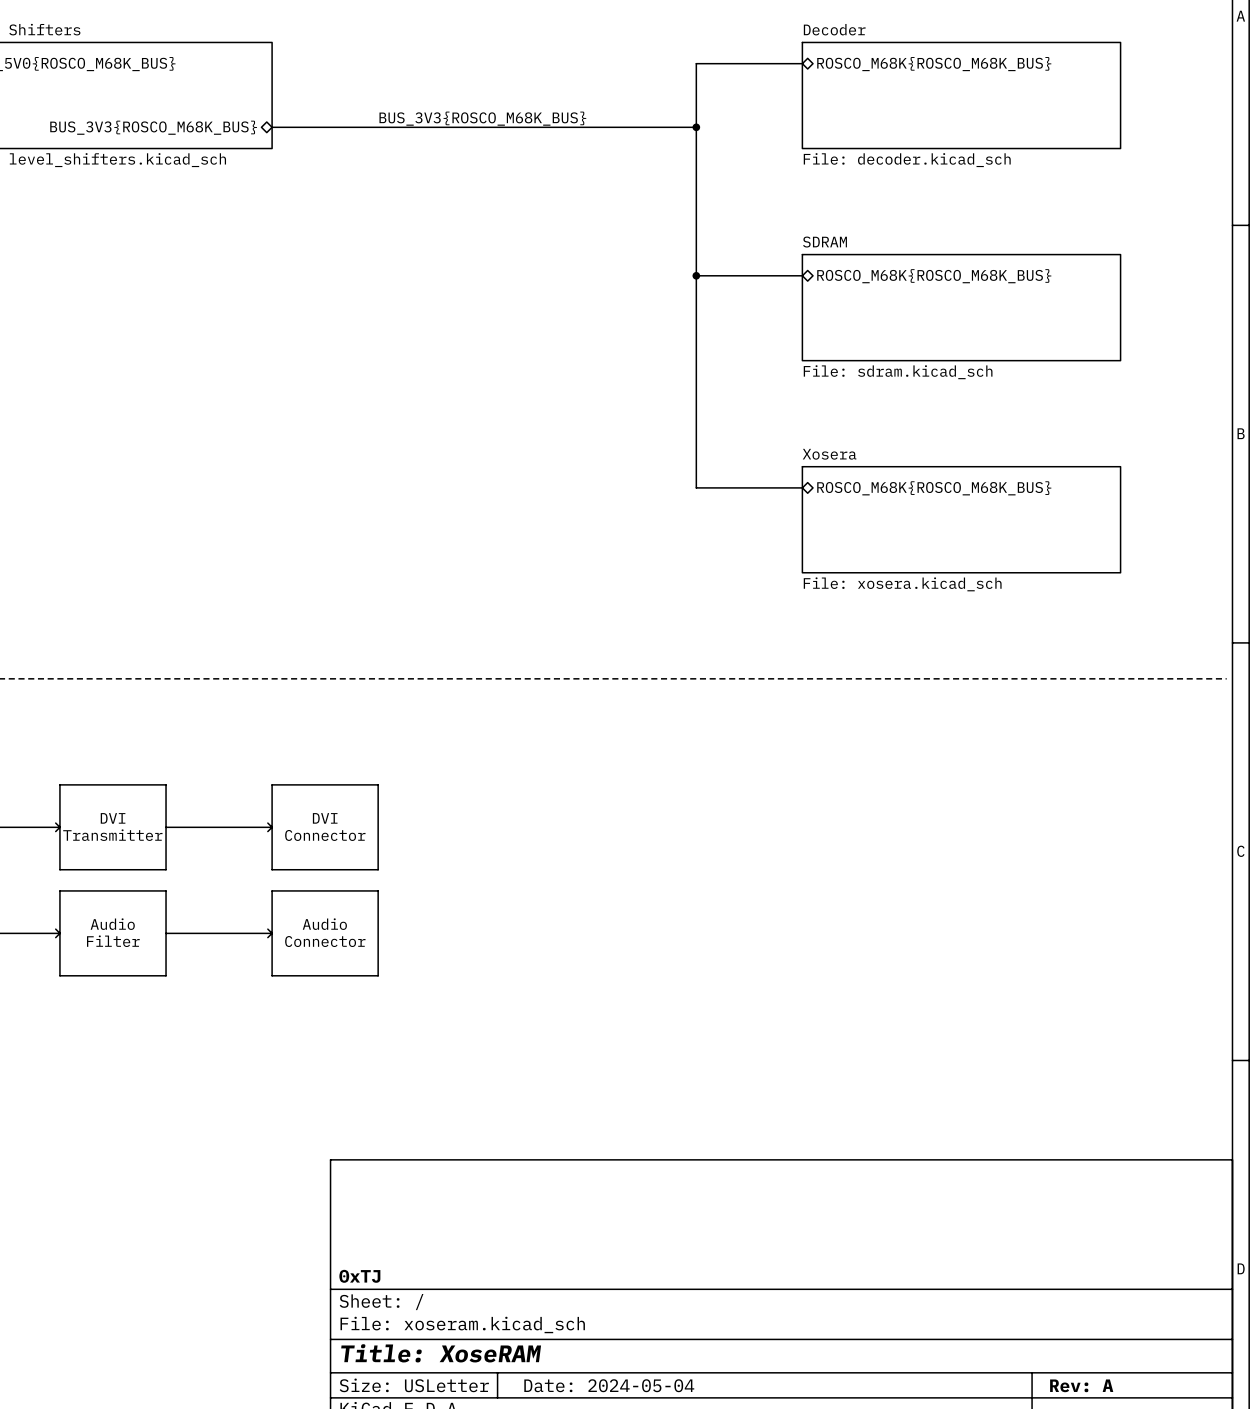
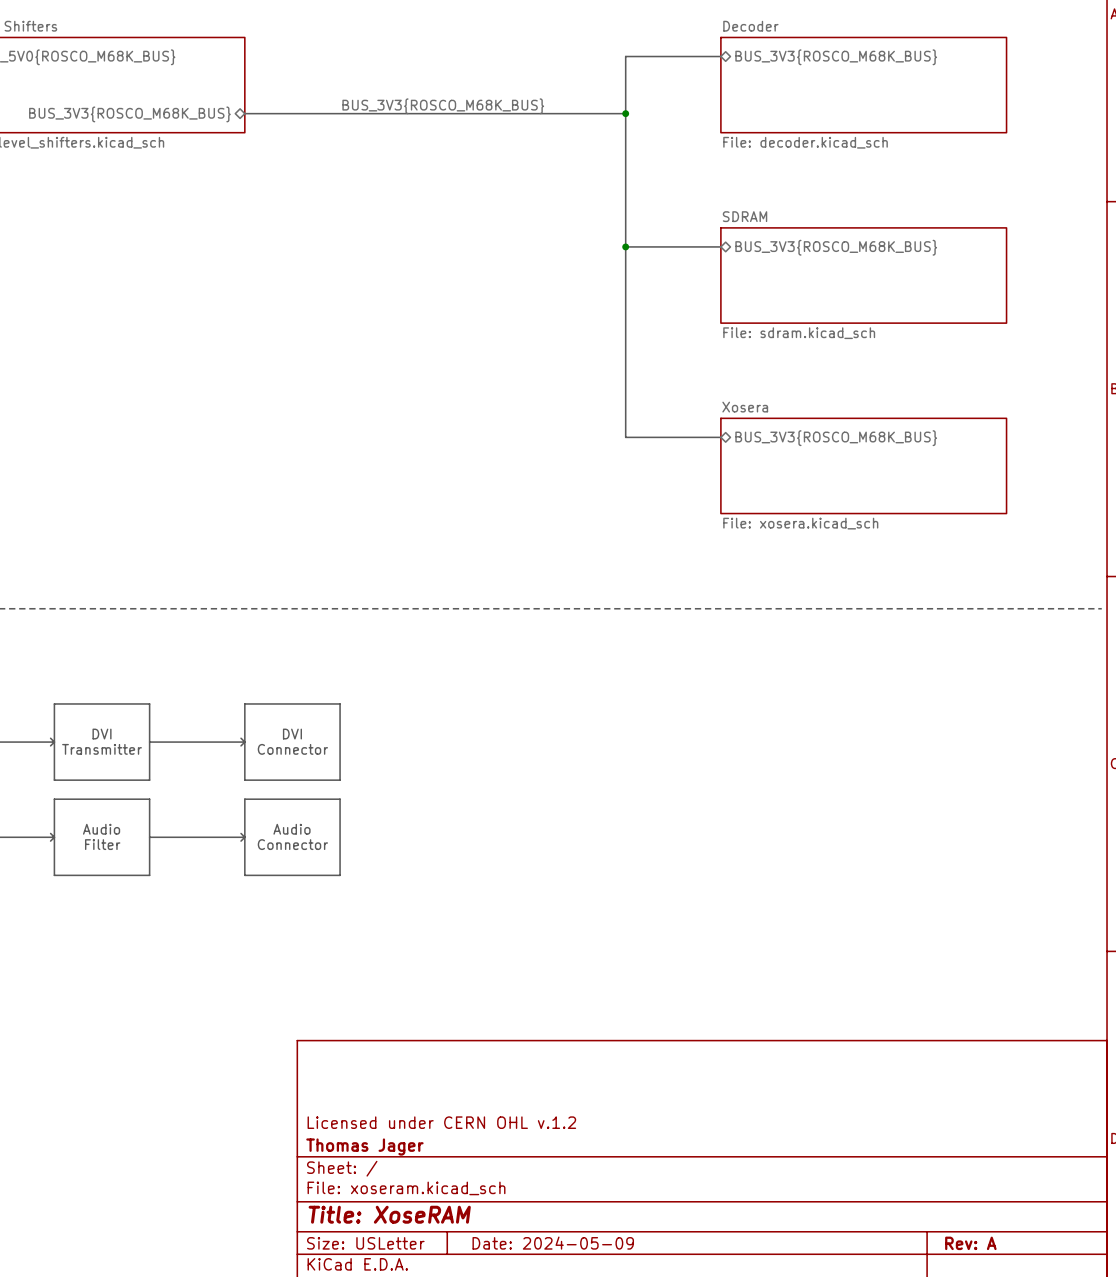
sheet pin: ROSCO_M68K{ROSCO_M68K_BUS} (934, 64) -> BUS_3V3{ROSCO_M68K_BUS} (836, 57)
sheet pin: ROSCO_M68K{ROSCO_M68K_BUS} (934, 276) -> BUS_3V3{ROSCO_M68K_BUS} (836, 247)
sheet pin: ROSCO_M68K{ROSCO_M68K_BUS} (934, 488) -> BUS_3V3{ROSCO_M68K_BUS} (836, 438)
title block: none -> Licensed under CERN OHL v.1.2 (441, 1122)
title block: 0xTJ (359, 1276) -> Thomas Jager (364, 1147)
title block: Date: 2024-05-04 (609, 1385) -> Date: 2024-05-09 (553, 1243)

